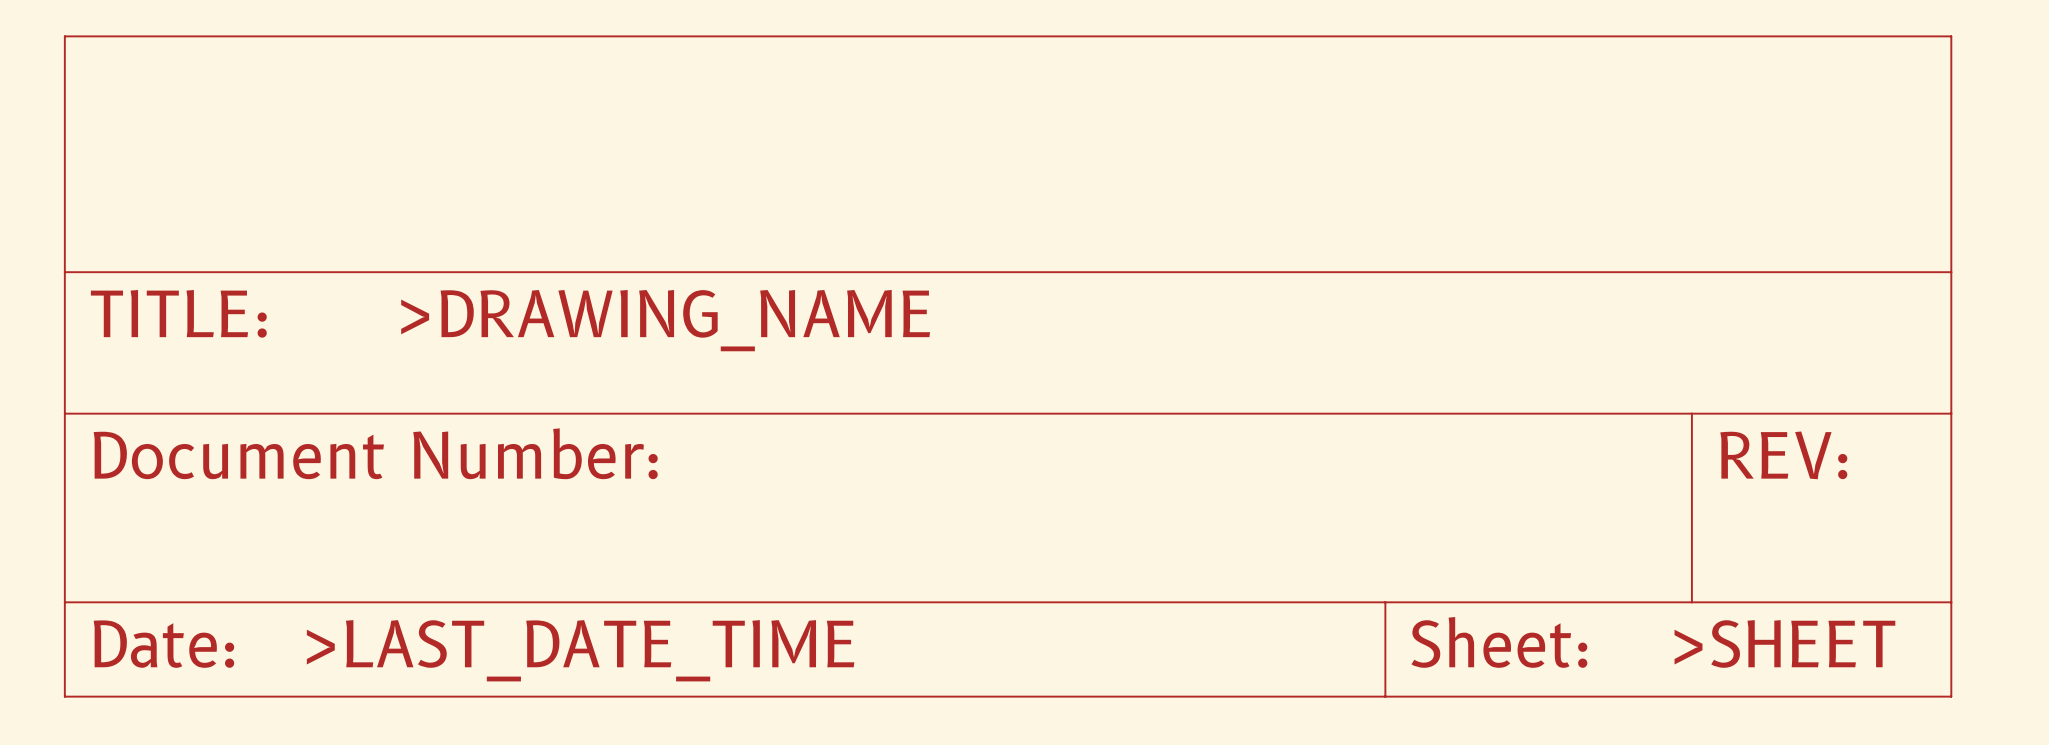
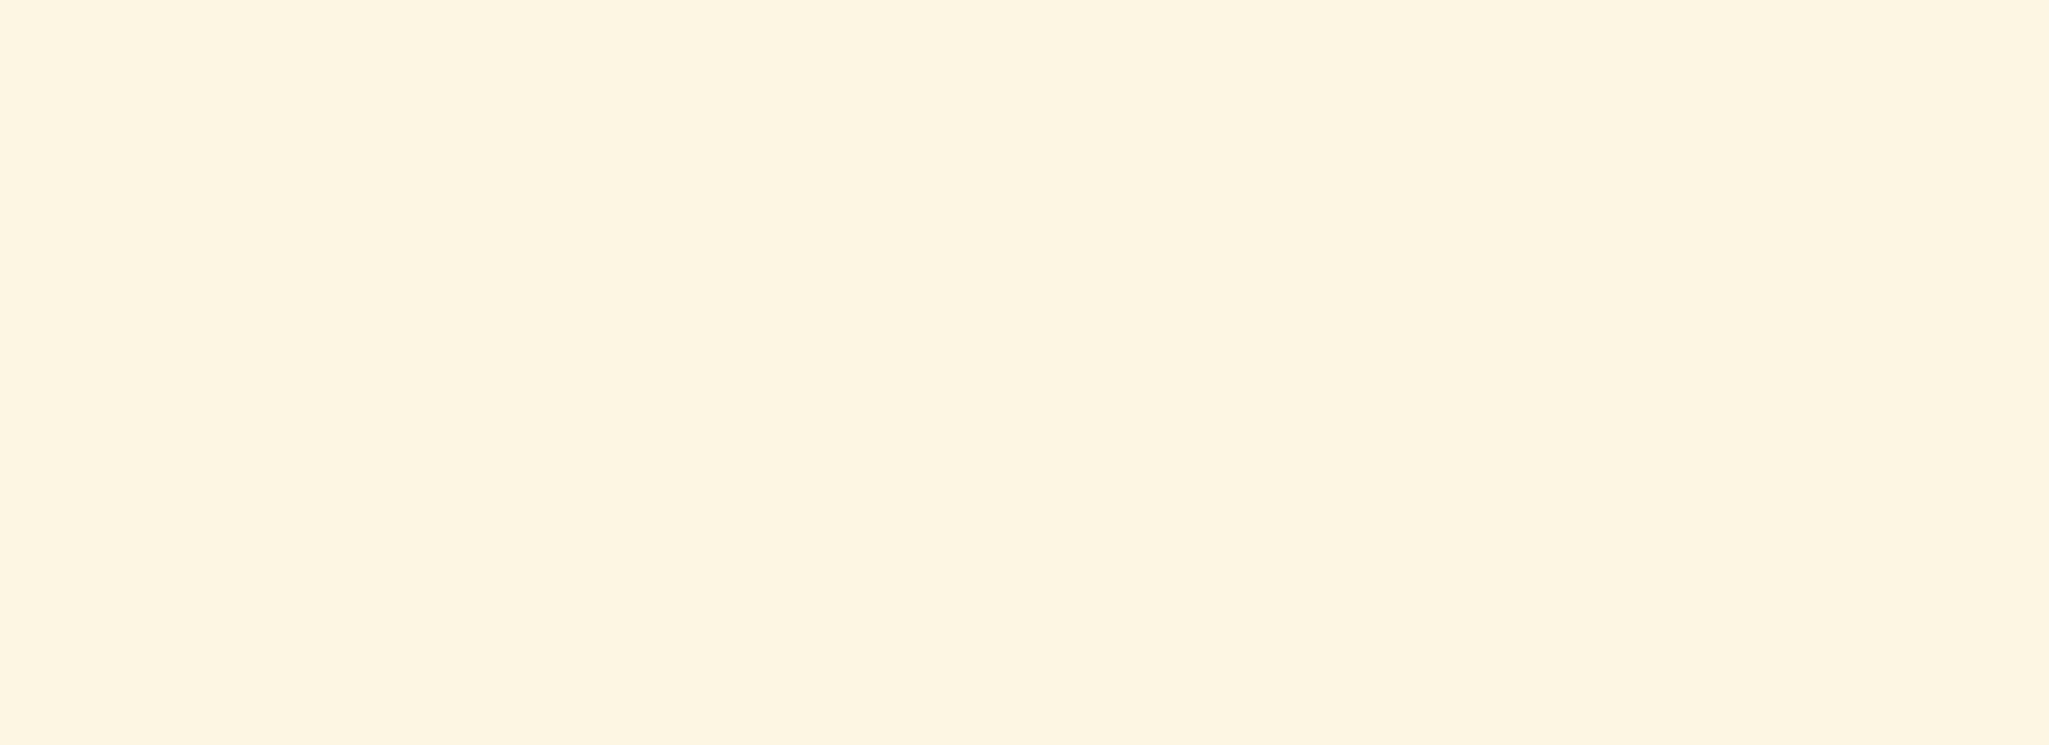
power symbol: (1008, 366) -> none

